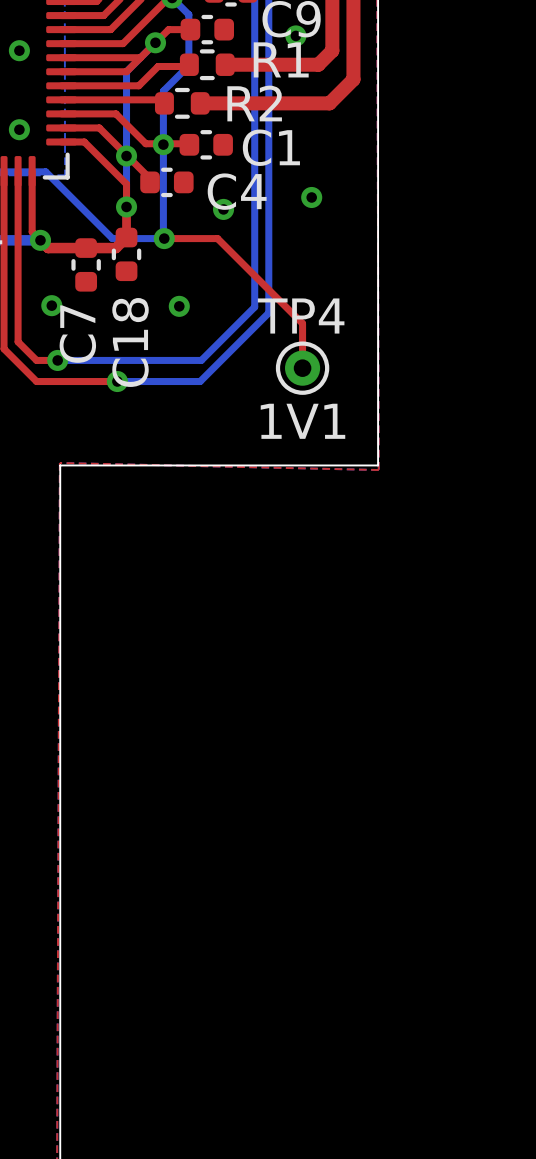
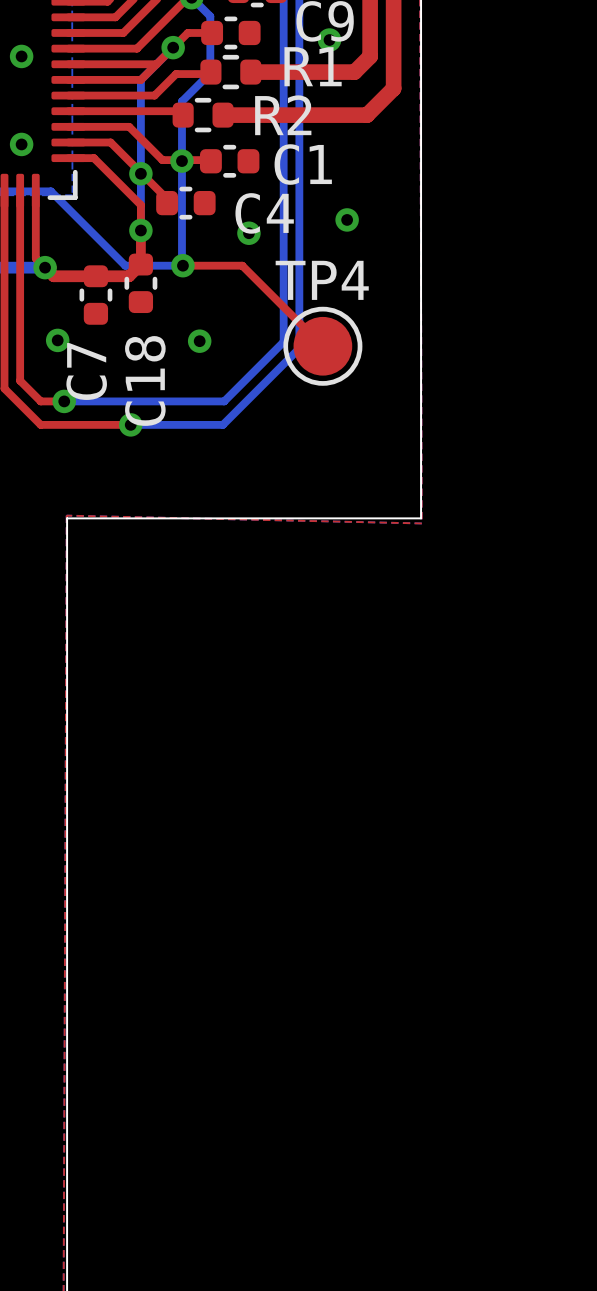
top track: (289, 310) (302, 323) (302, 368) -> none
TP4 footprint: [275, 341, 330, 395] -> [283, 306, 363, 386]
TP4 value: 1V1 (302, 421) -> none

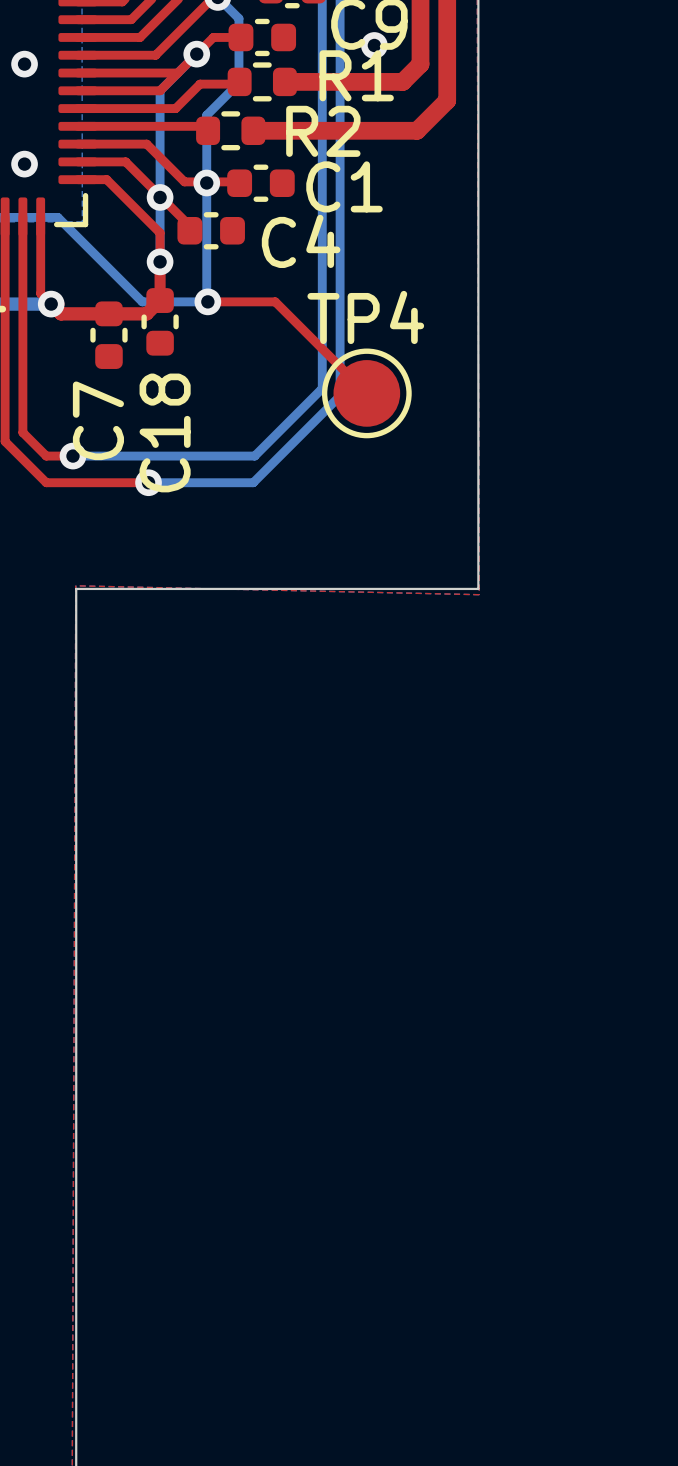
via: (347, 219) -> none
via: (248, 233) -> none
via: (57, 340) -> none
via: (199, 341) -> none

